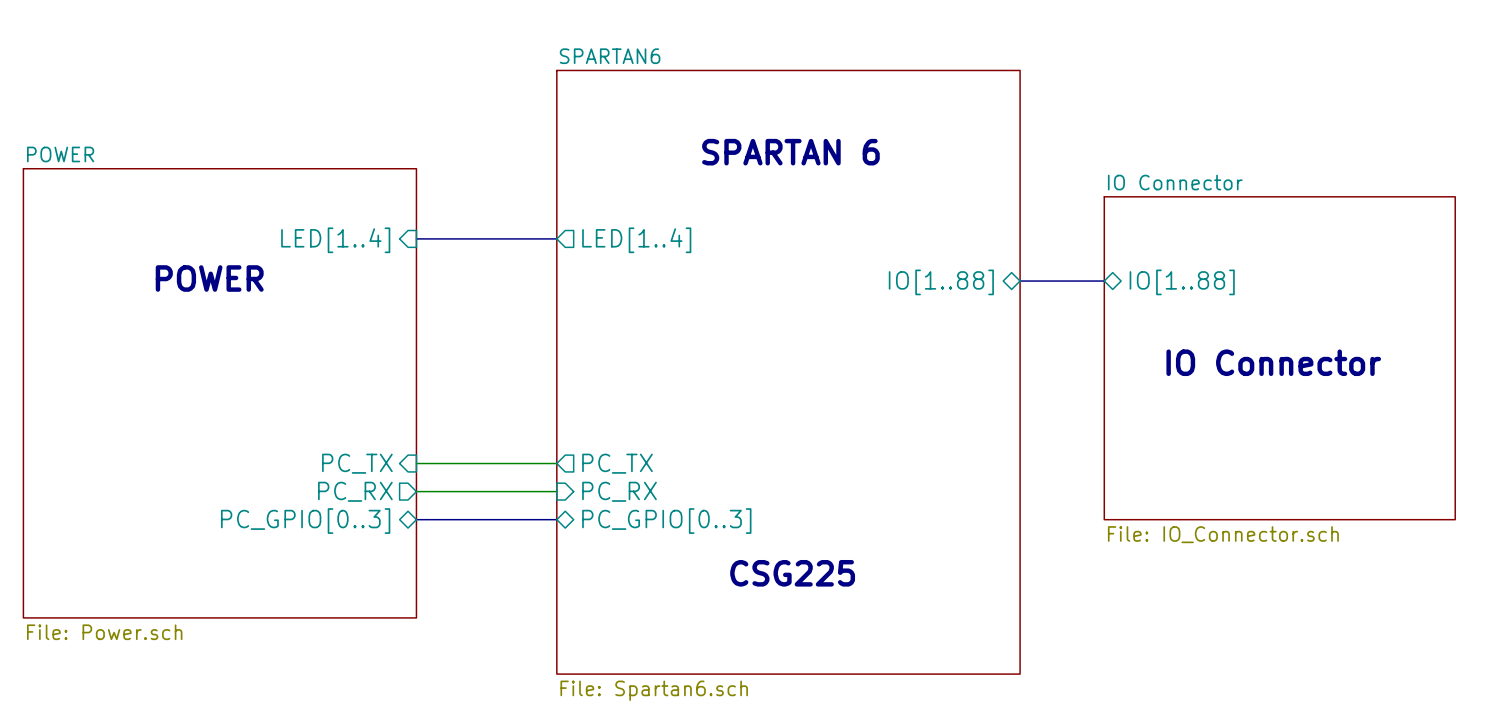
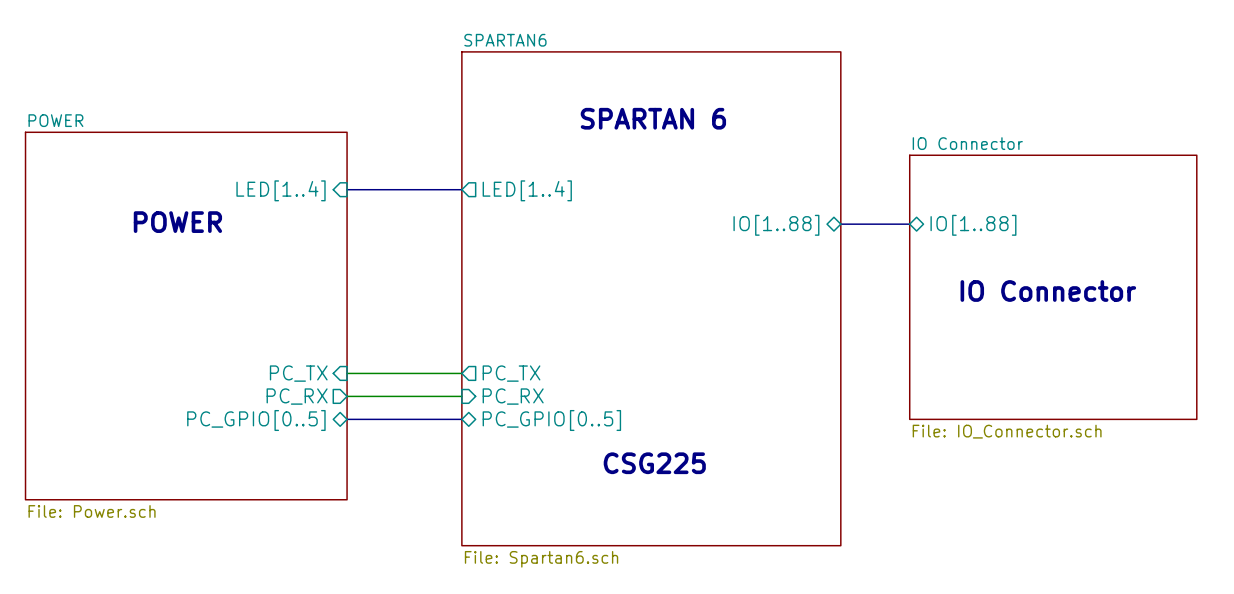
sheet pin: PC_GPIO[0..3] (305, 521) -> PC_GPIO[0..5] (256, 420)
sheet pin: PC_GPIO[0..3] (666, 521) -> PC_GPIO[0..5] (551, 420)

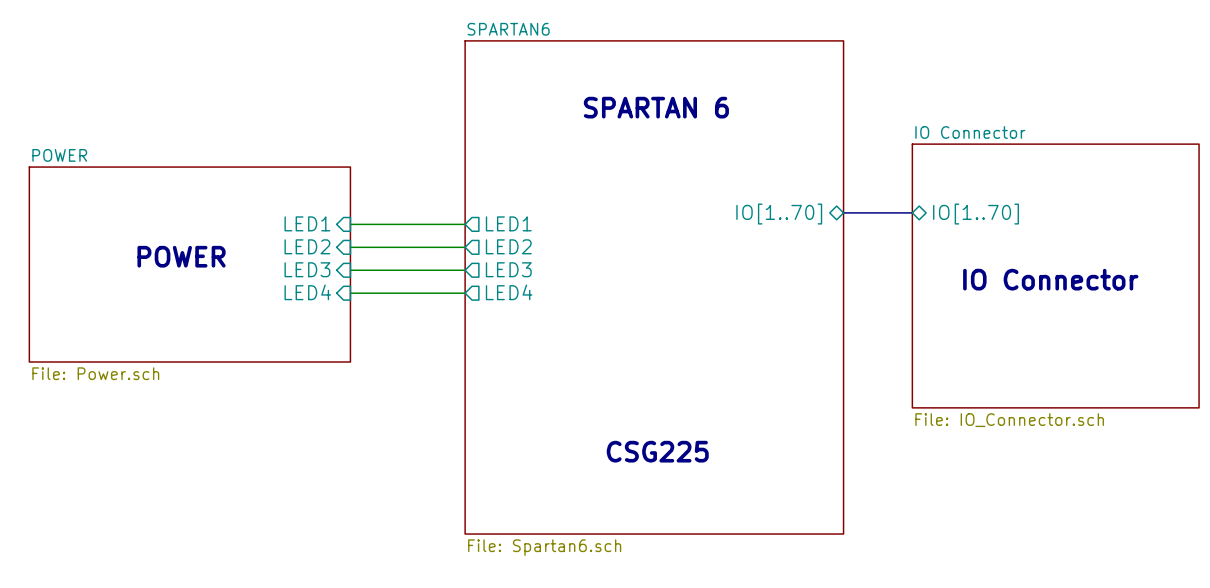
bus: (347, 189) (461, 189) -> none
sheet pin: LED[1..4] (281, 190) -> none
sheet pin: LED[1..4] (527, 190) -> none
text position: POWER (177, 222) -> POWER (181, 256)
sheet pin: IO[1..88] (776, 225) -> IO[1..70] (779, 214)
sheet pin: IO[1..88] (973, 225) -> IO[1..70] (976, 214)
sheet pin: none -> LED1 (307, 223)
wire: none -> (350, 224) (465, 224)
sheet pin: none -> LED1 (508, 223)
sheet pin: none -> LED2 (307, 246)
wire: none -> (350, 247) (465, 247)
sheet pin: none -> LED2 (508, 246)
sheet POWER: none -> File: Power.sch (189, 264)
sheet pin: none -> LED3 (307, 269)
sheet pin: none -> LED3 (508, 269)
sheet pin: none -> LED4 (307, 292)
sheet pin: none -> LED4 (509, 292)
sheet POWER: File: Power.sch (186, 316) -> none
sheet pin: PC_TX (298, 373) -> none
wire: (347, 373) (461, 373) -> (350, 270) (465, 270)
sheet pin: PC_TX (511, 373) -> none
sheet pin: PC_RX (297, 396) -> none
wire: (347, 396) (461, 396) -> (350, 293) (465, 293)
sheet pin: PC_RX (513, 396) -> none
bus: (347, 419) (461, 419) -> none
sheet pin: PC_GPIO[0..5] (256, 420) -> none
sheet pin: PC_GPIO[0..5] (551, 420) -> none

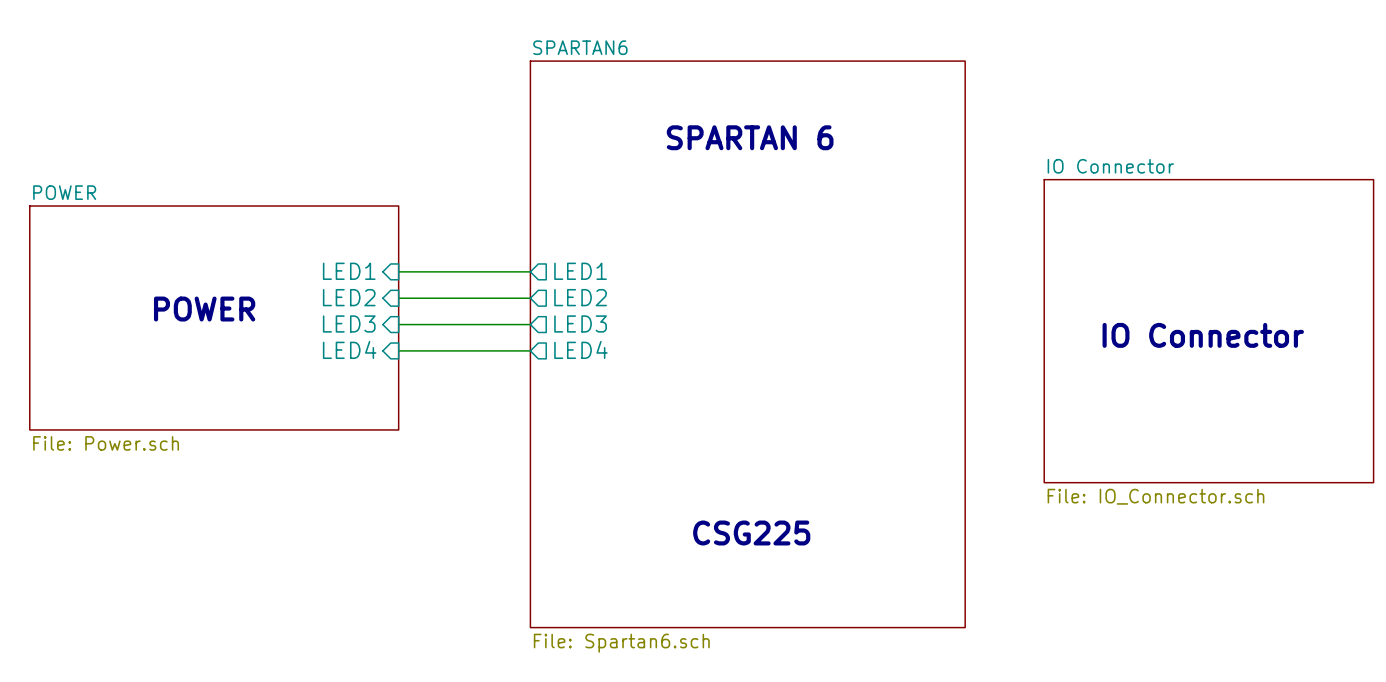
bus: (843, 212) (912, 212) -> none
sheet pin: IO[1..70] (779, 214) -> none
sheet pin: IO[1..70] (976, 214) -> none

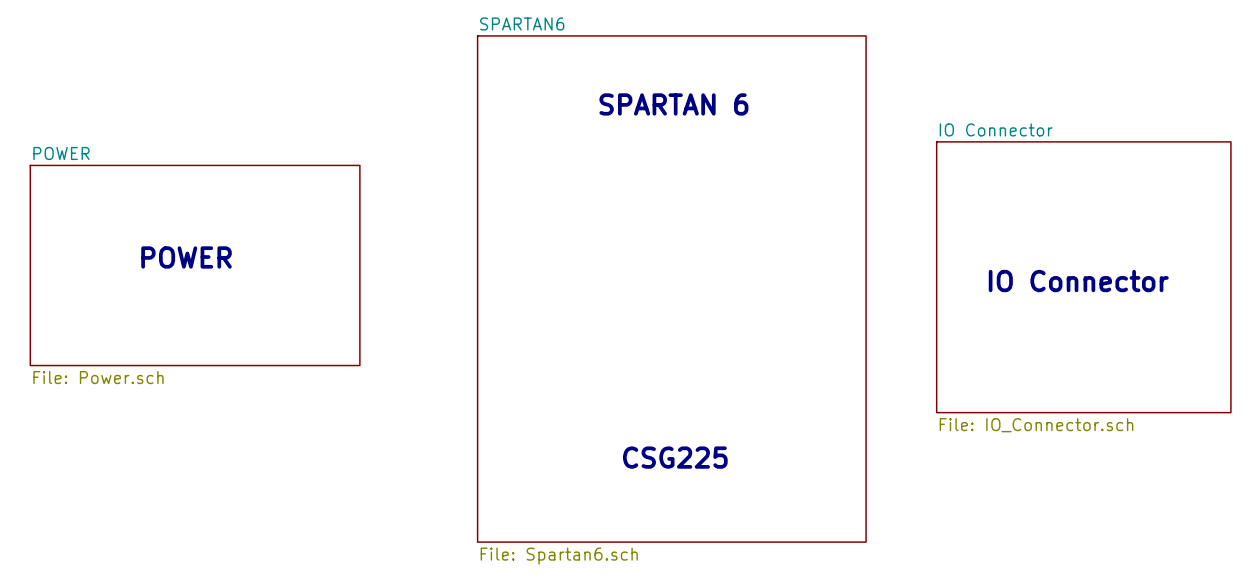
sheet pin: LED1 (349, 271) -> none
wire: (398, 271) (530, 271) -> none
sheet pin: LED1 (580, 271) -> none
sheet pin: LED2 (349, 297) -> none
sheet pin: LED2 (580, 297) -> none
wire: (398, 298) (530, 298) -> none
sheet pin: LED3 (349, 323) -> none
sheet pin: LED3 (580, 323) -> none
wire: (398, 324) (530, 324) -> none
sheet pin: LED4 (349, 349) -> none
sheet pin: LED4 (580, 349) -> none
wire: (398, 350) (530, 350) -> none

